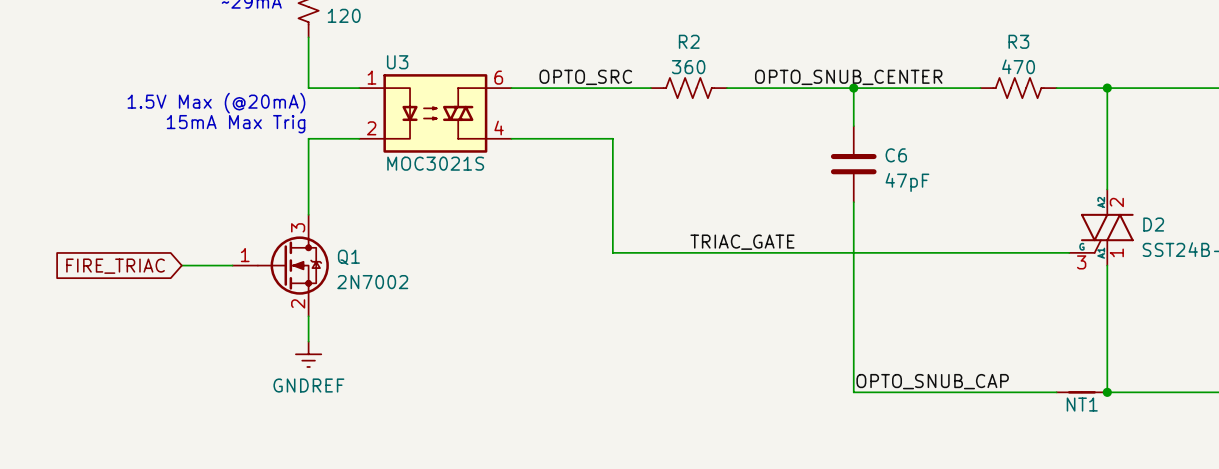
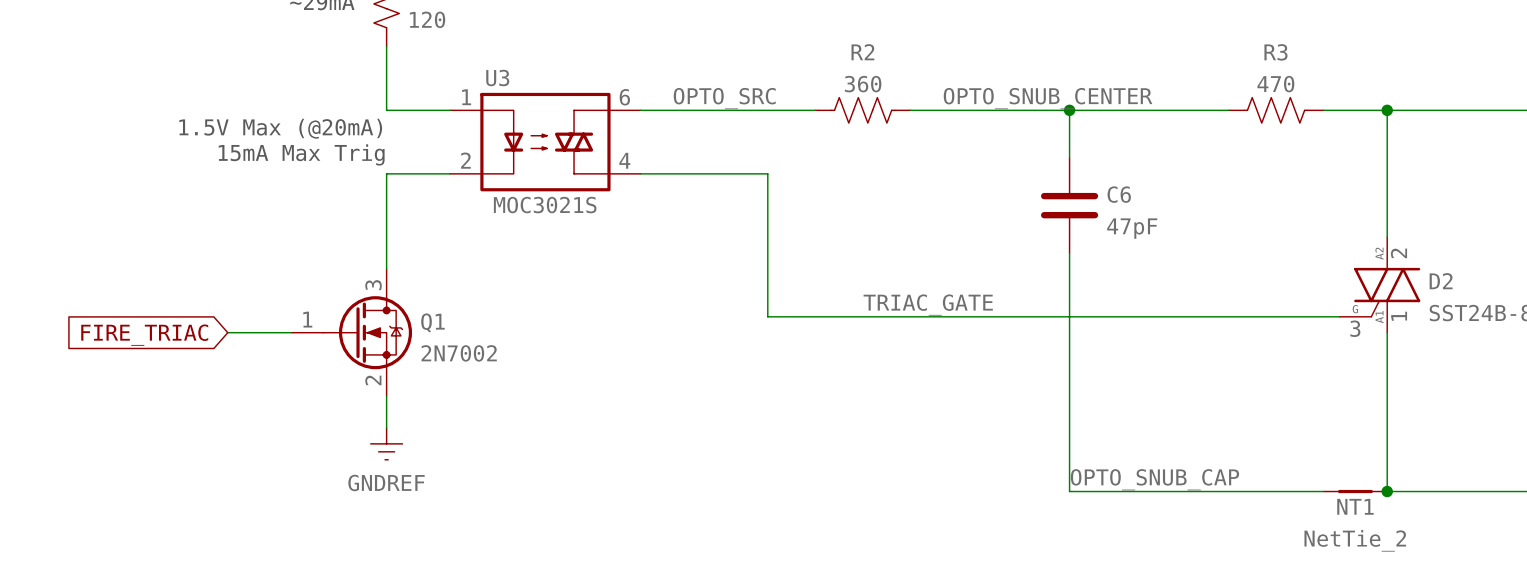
NT1 value: none -> NetTie_2 (1355, 540)

